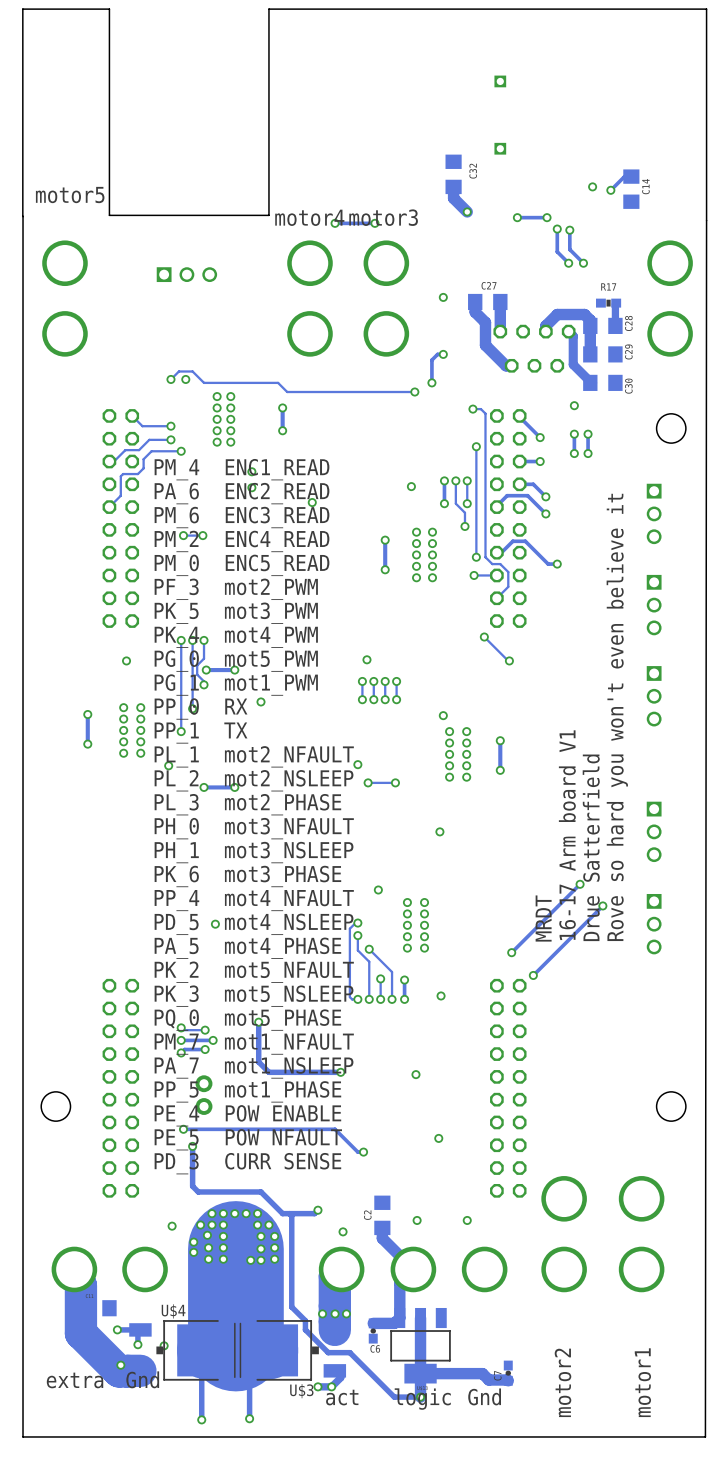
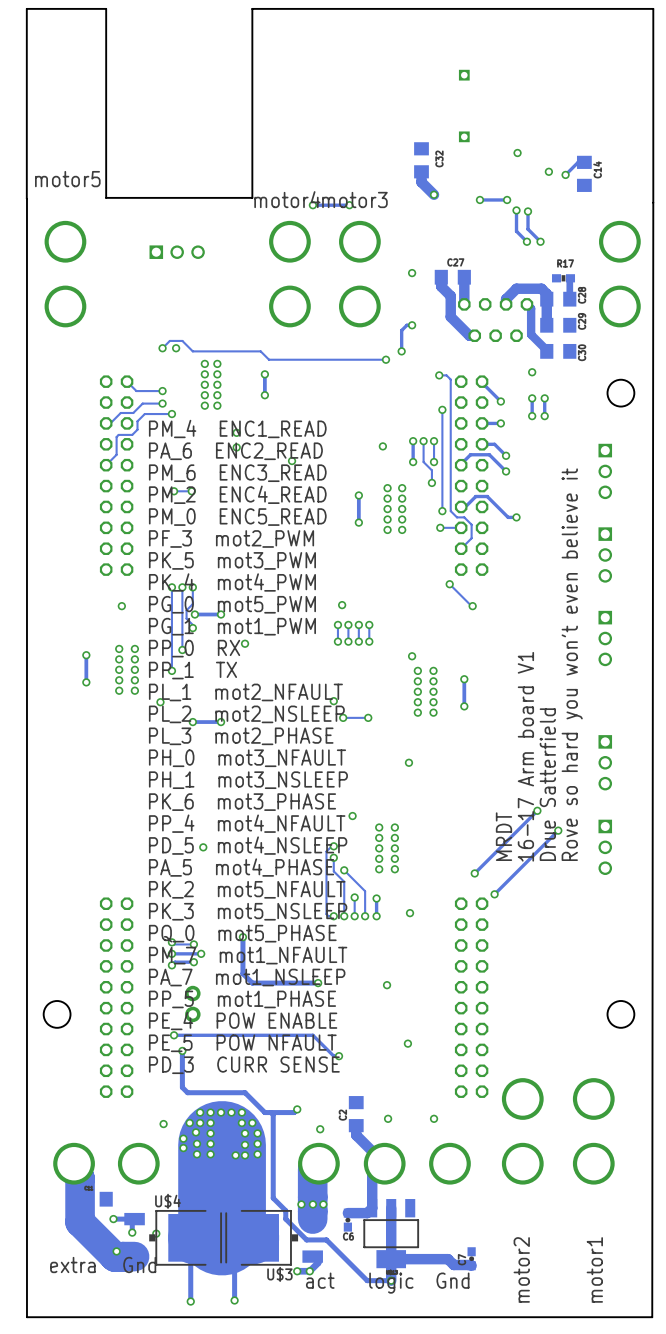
via: none -> (517, 152)

